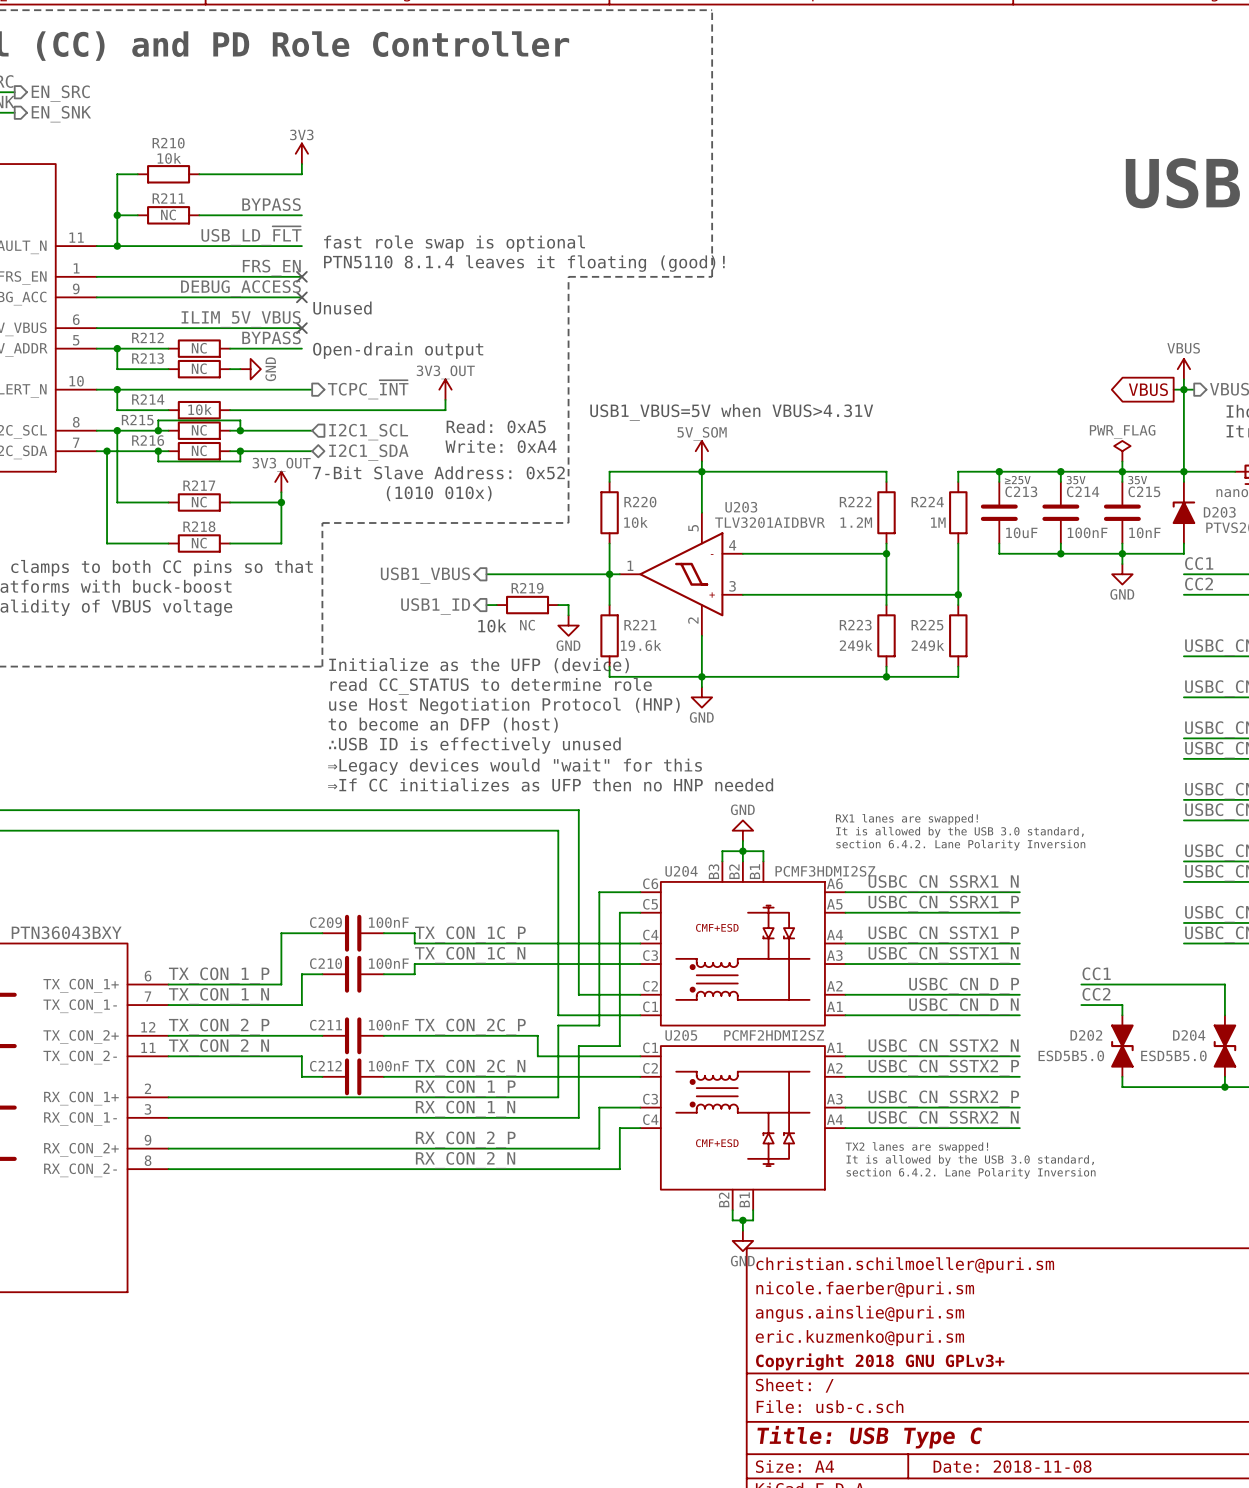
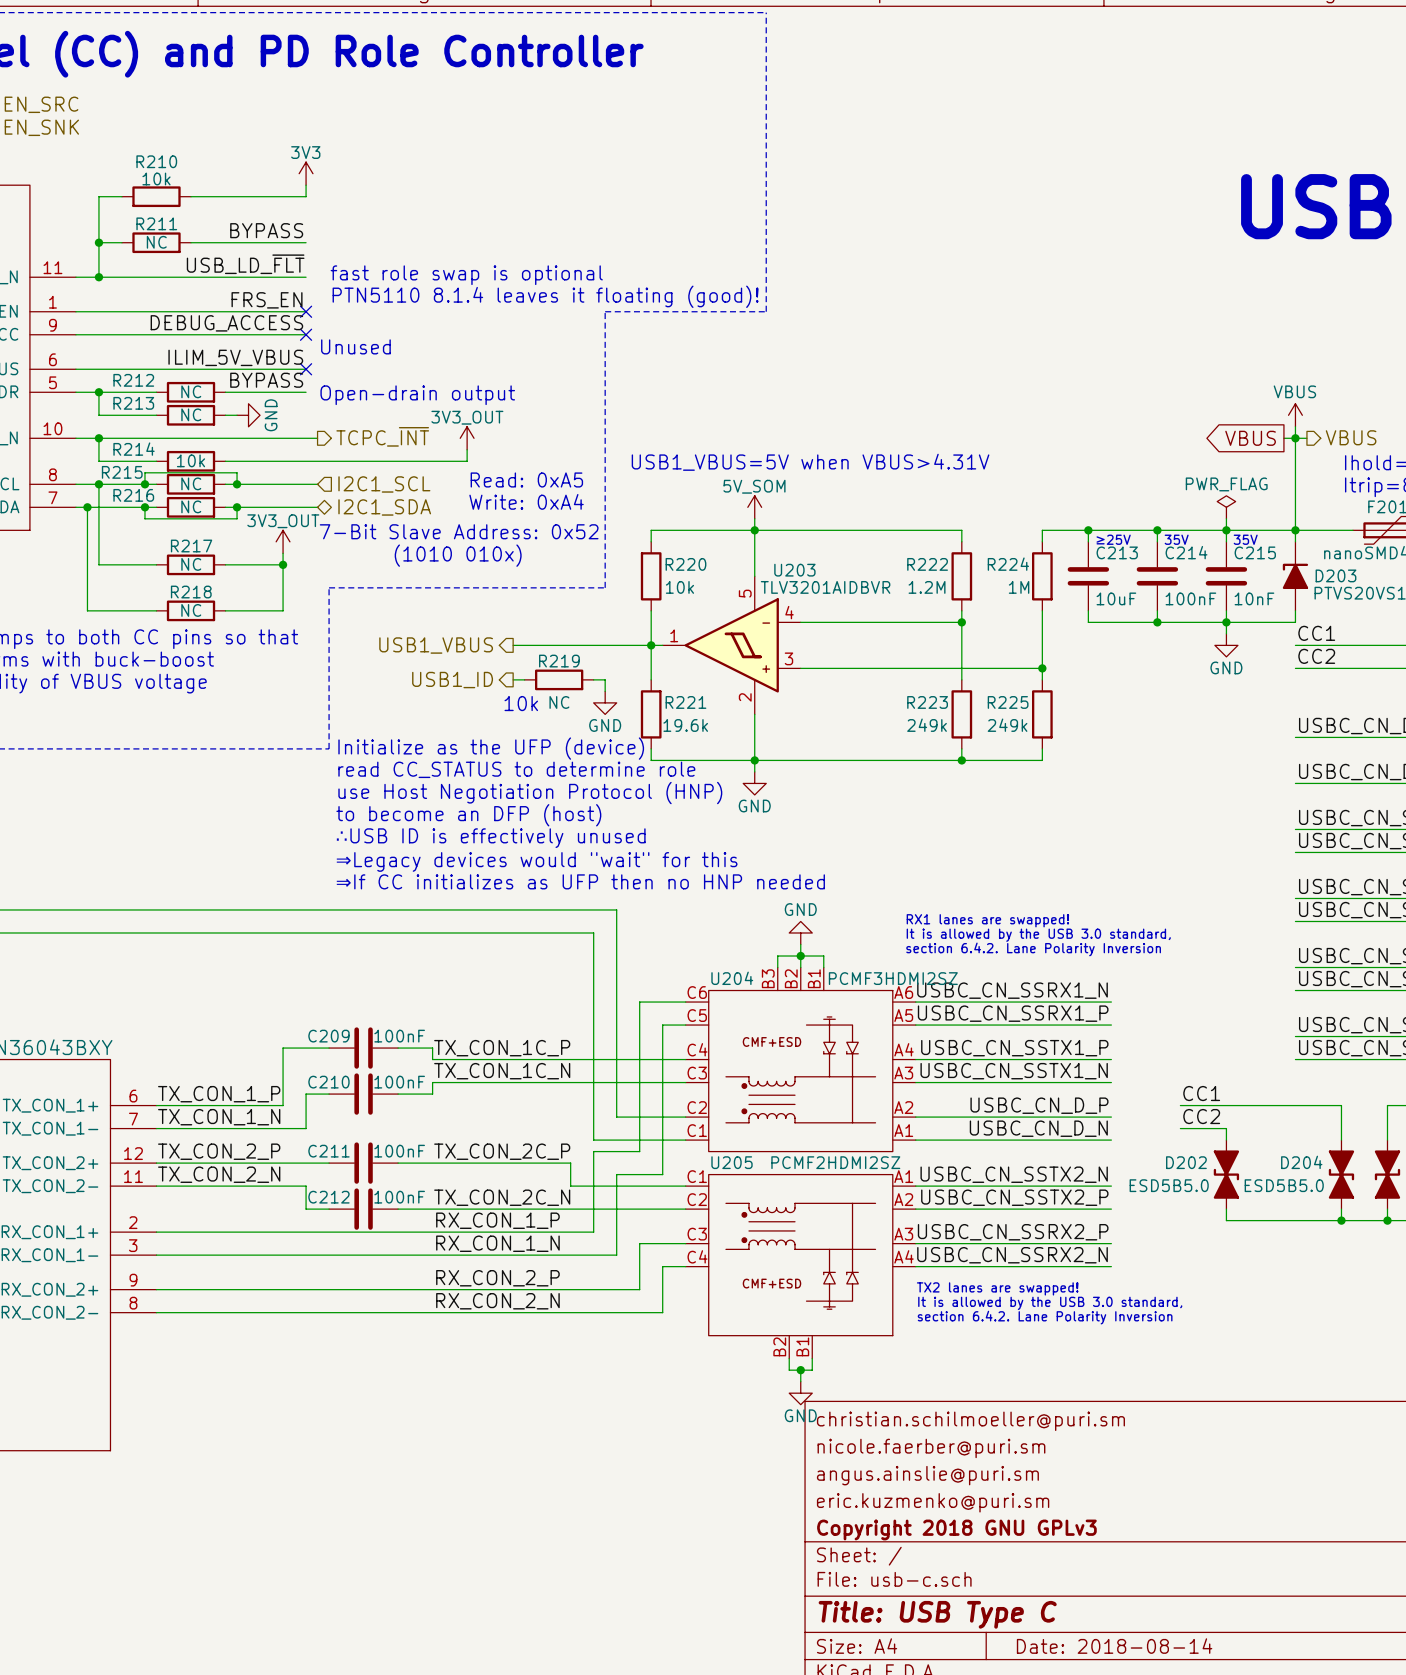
title block: Copyright 2018 GNU GPLv3+ (880, 1361) -> Copyright 2018 GNU GPLv3 (956, 1529)
title block: Date: 2018-11-08 (1012, 1466) -> Date: 2018-08-14 (1114, 1646)

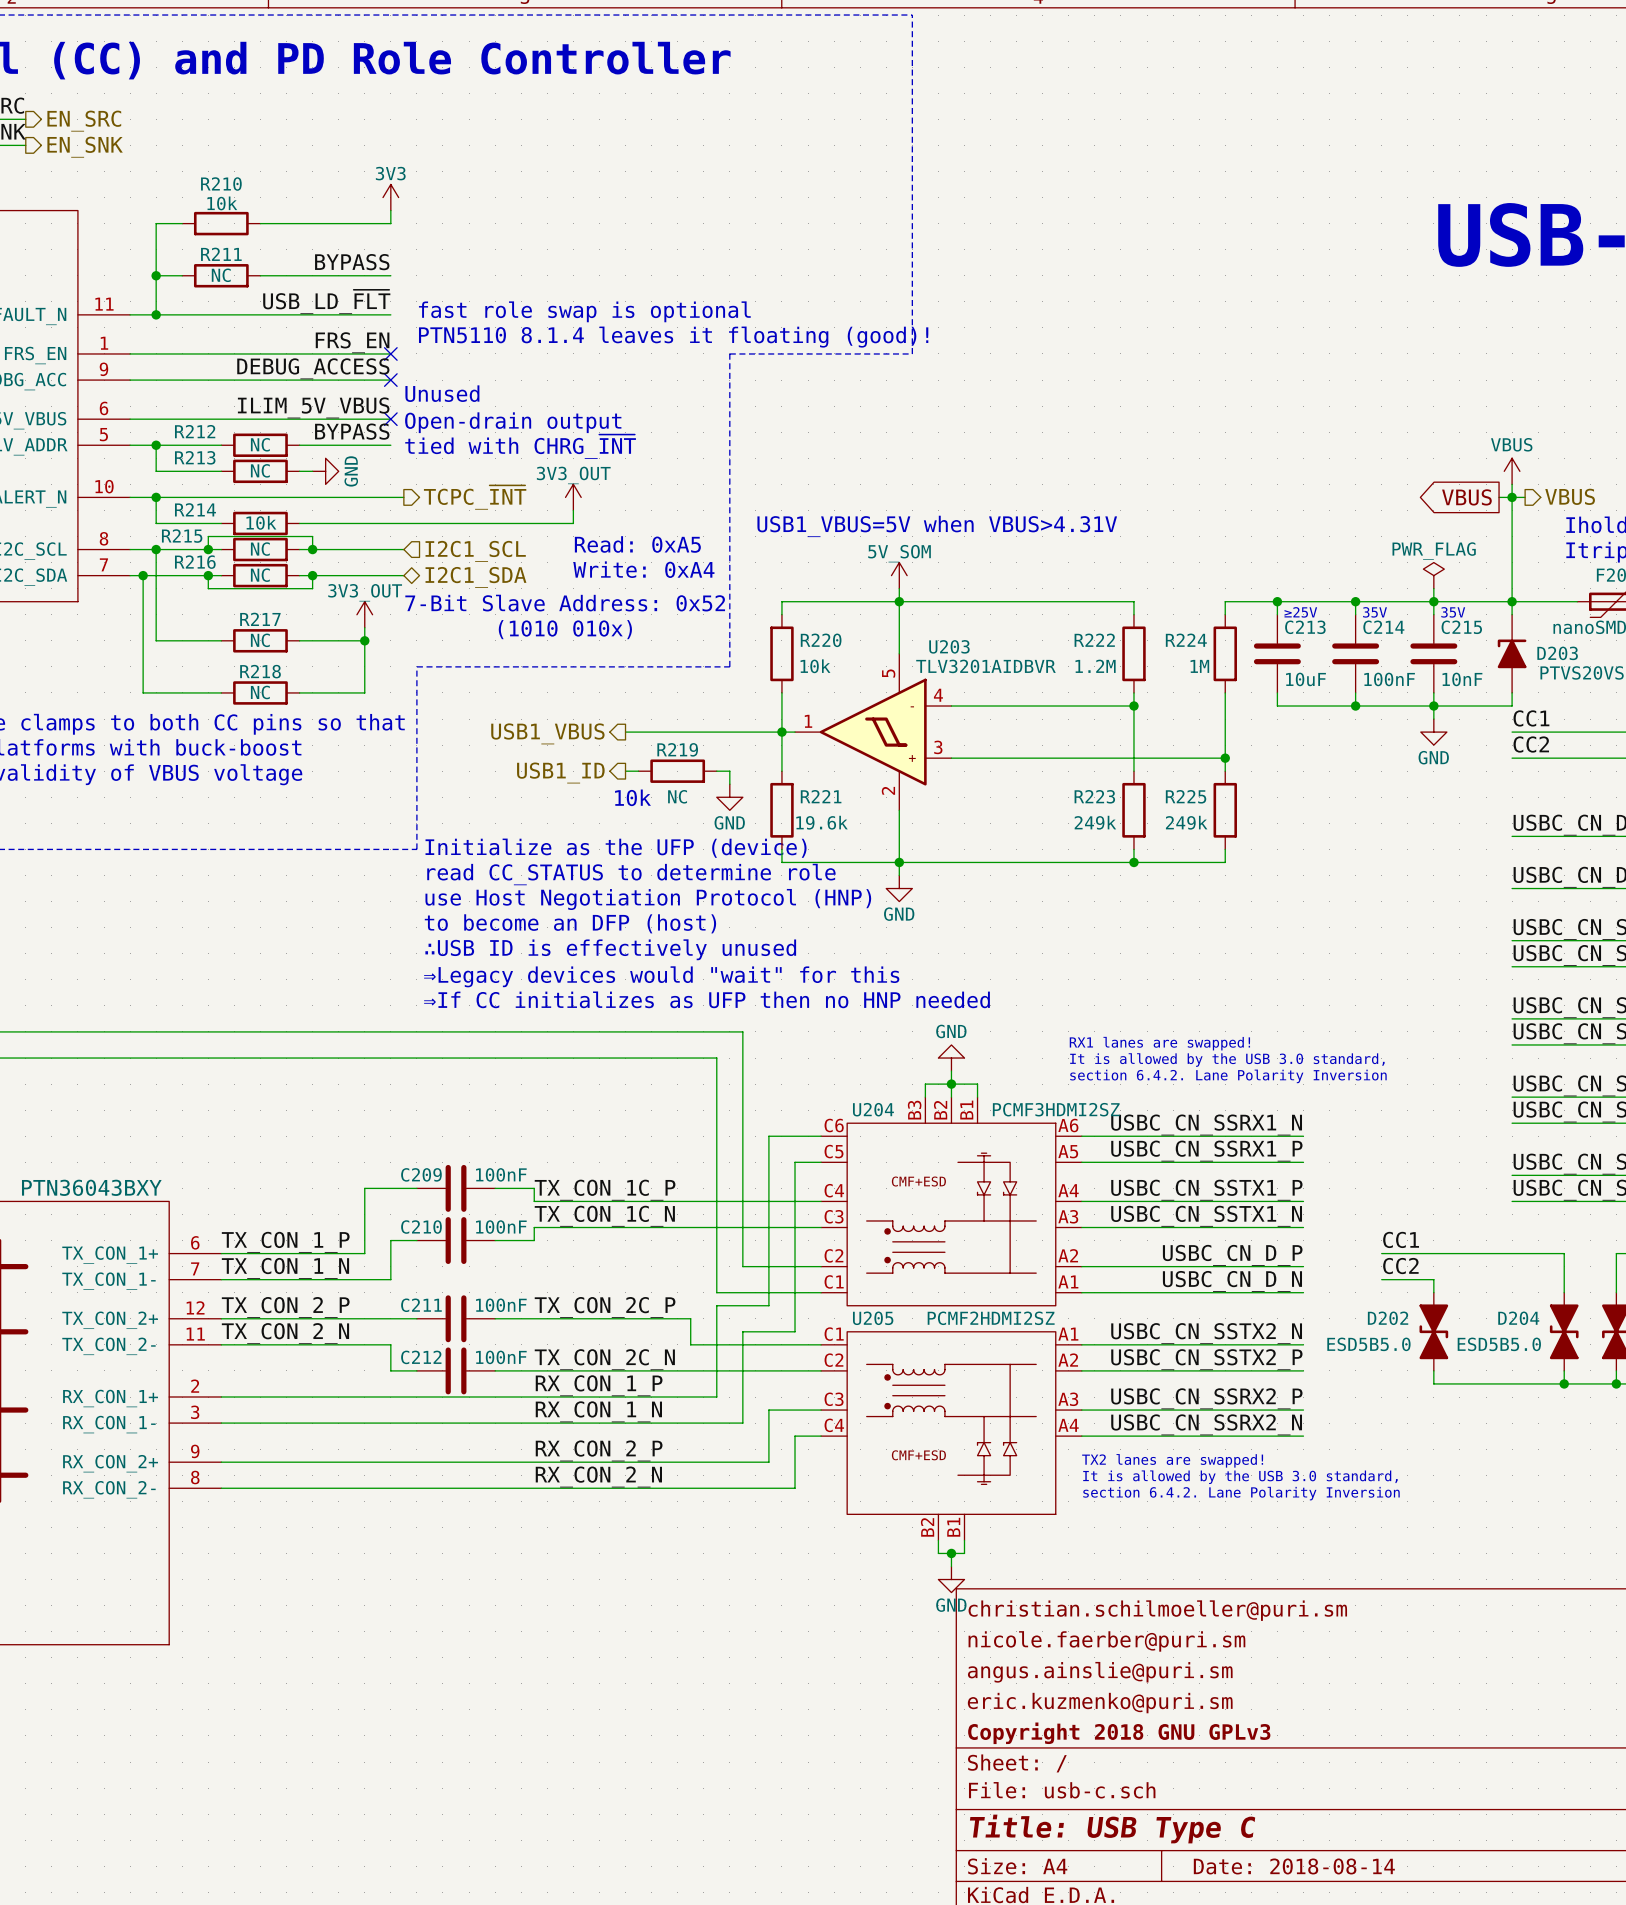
text: none -> Open-drain output (513, 422)
text: Open-drain output (417, 395) -> tied with CHRG_~{INT} (520, 446)

